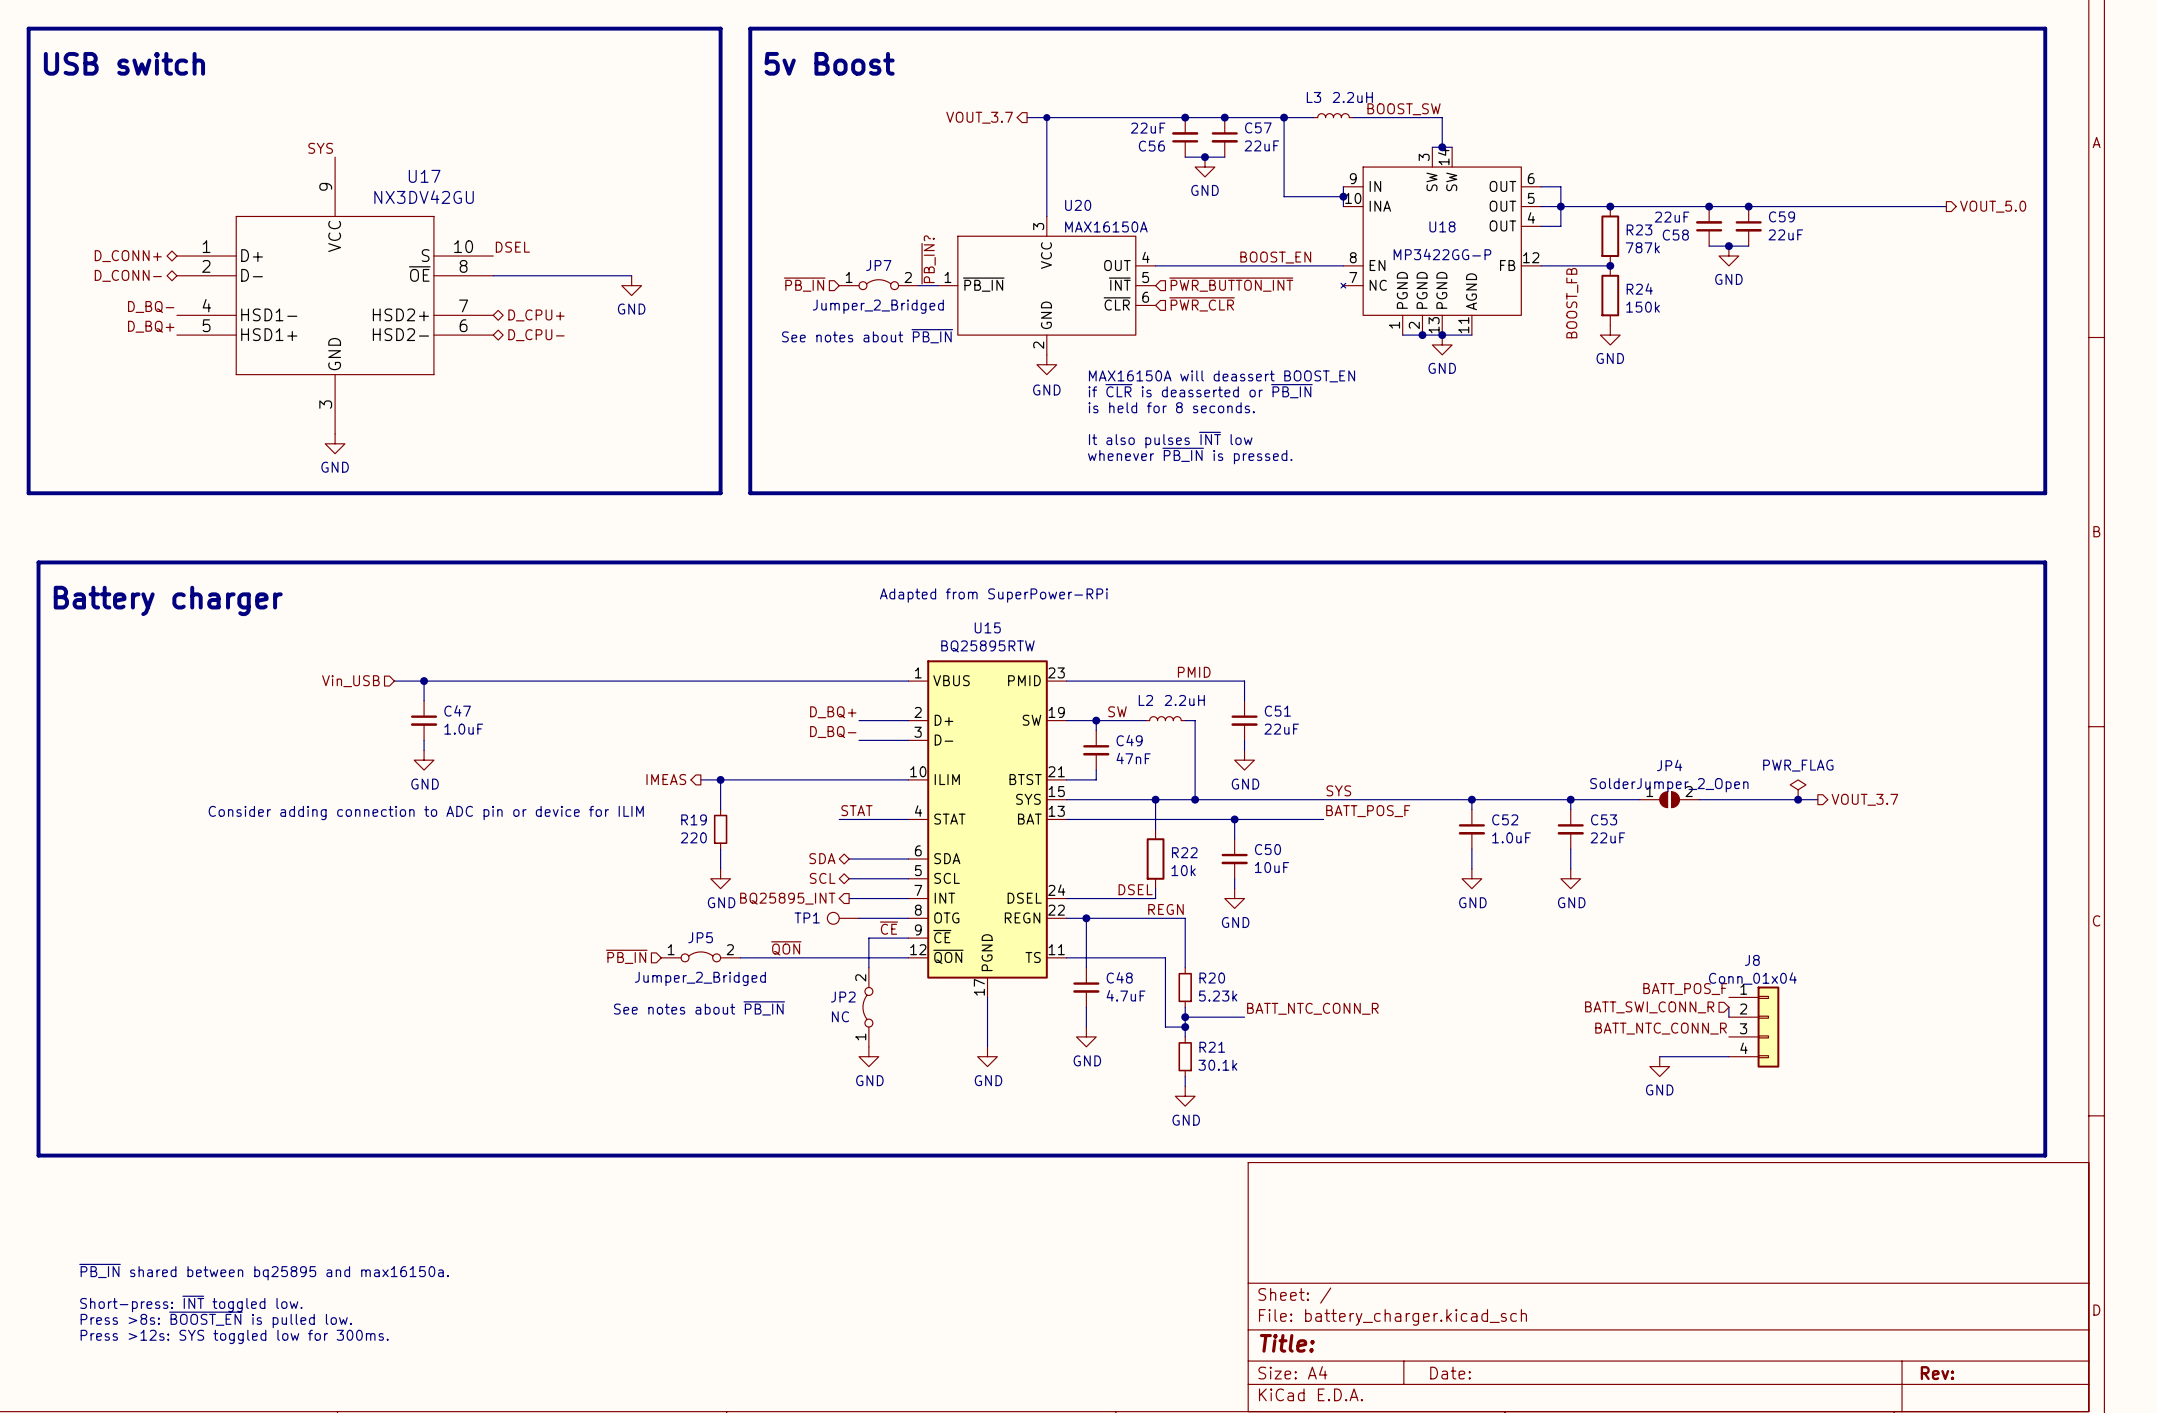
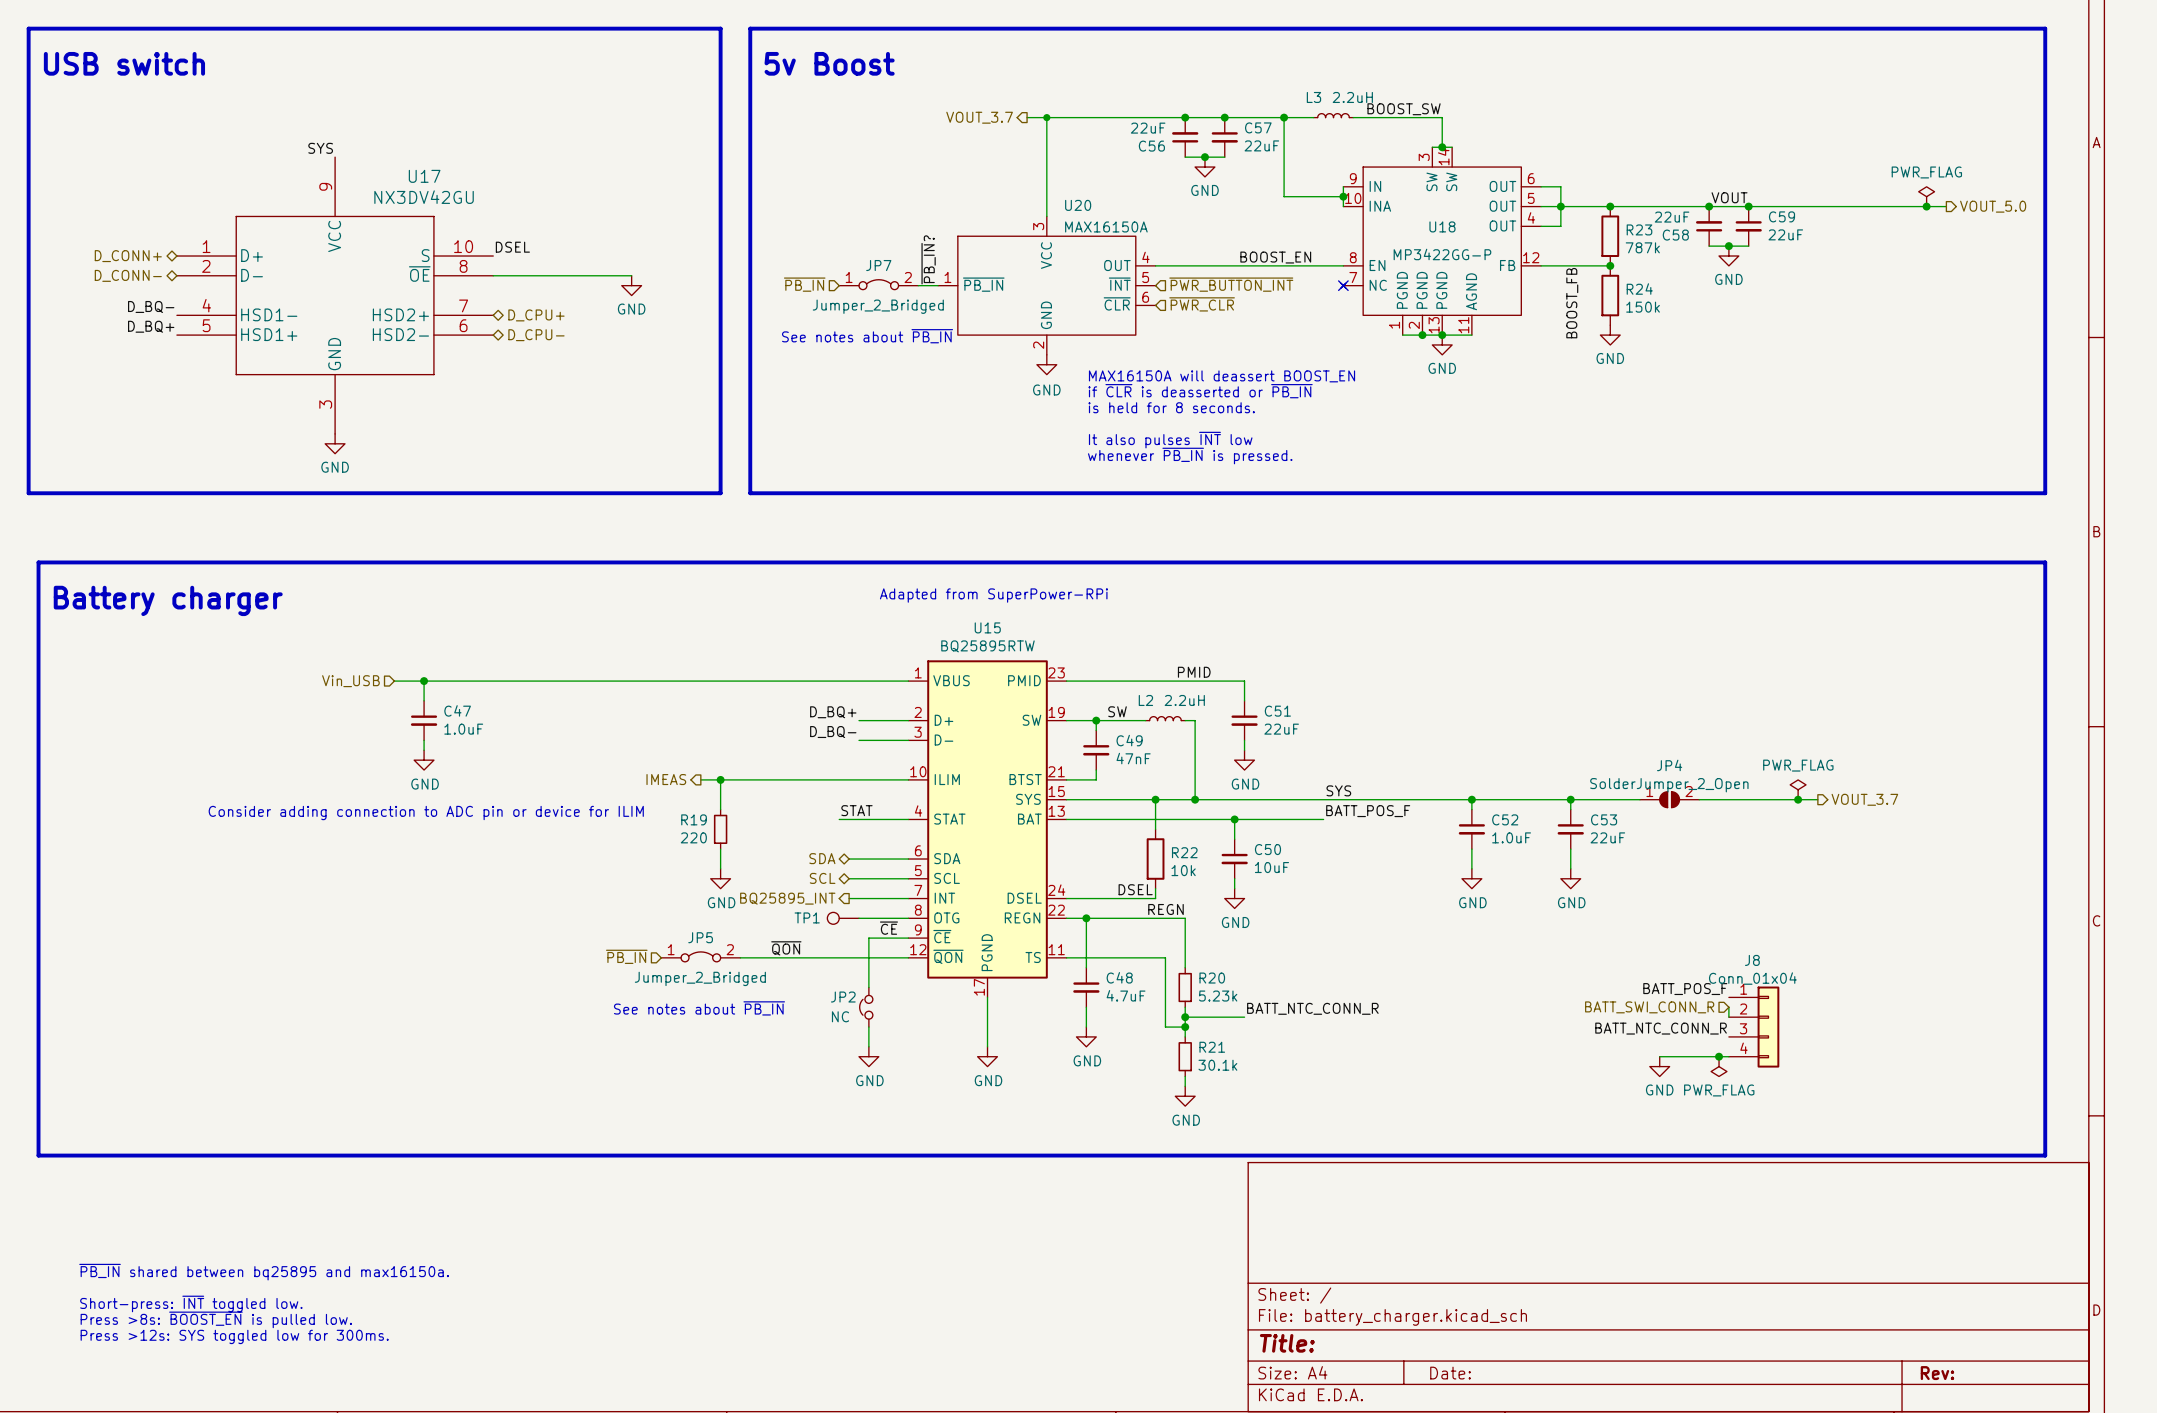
power symbol: none -> PWR_FLAG (1926, 196)
label: none -> VOUT (1729, 197)
junction: none -> (1926, 206)
no-connect mark: none -> (1343, 285)
JP2 symbol: [862, 967, 873, 1047] -> [859, 987, 873, 1028]
junction: none -> (1719, 1056)
power symbol: none -> PWR_FLAG (1719, 1066)

